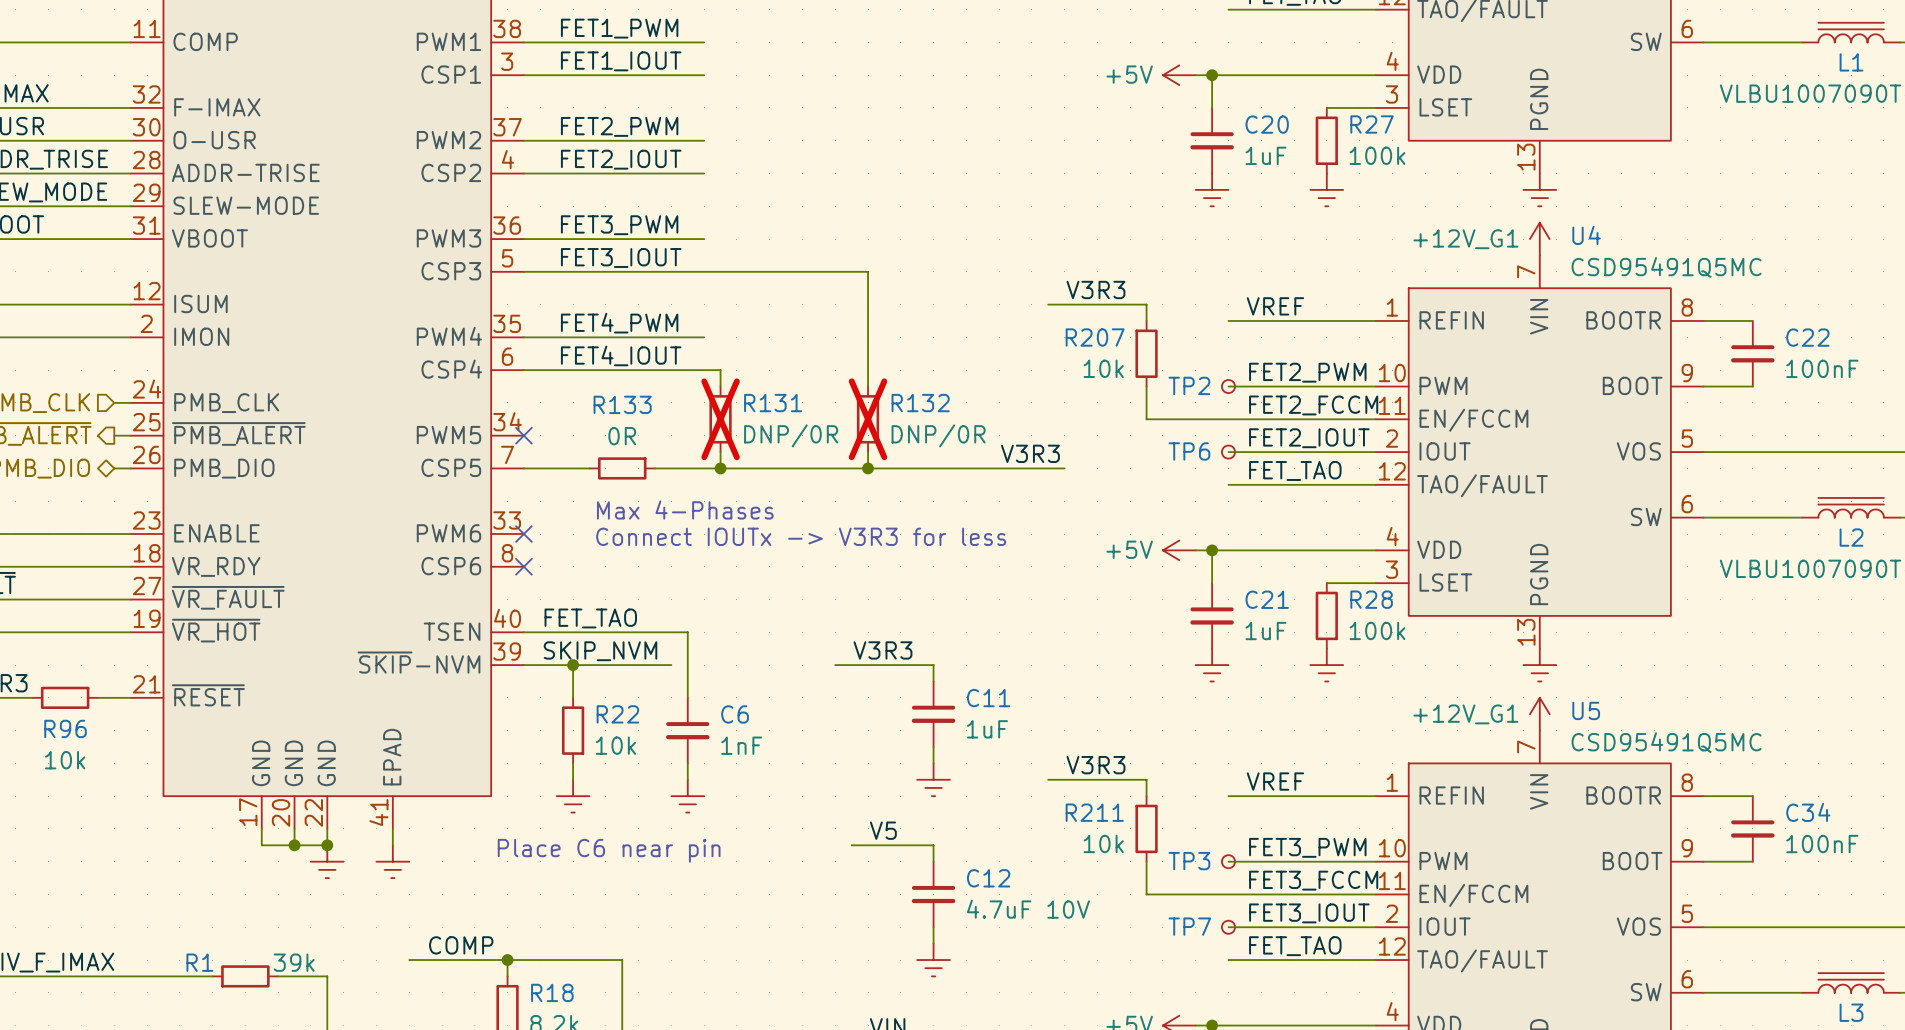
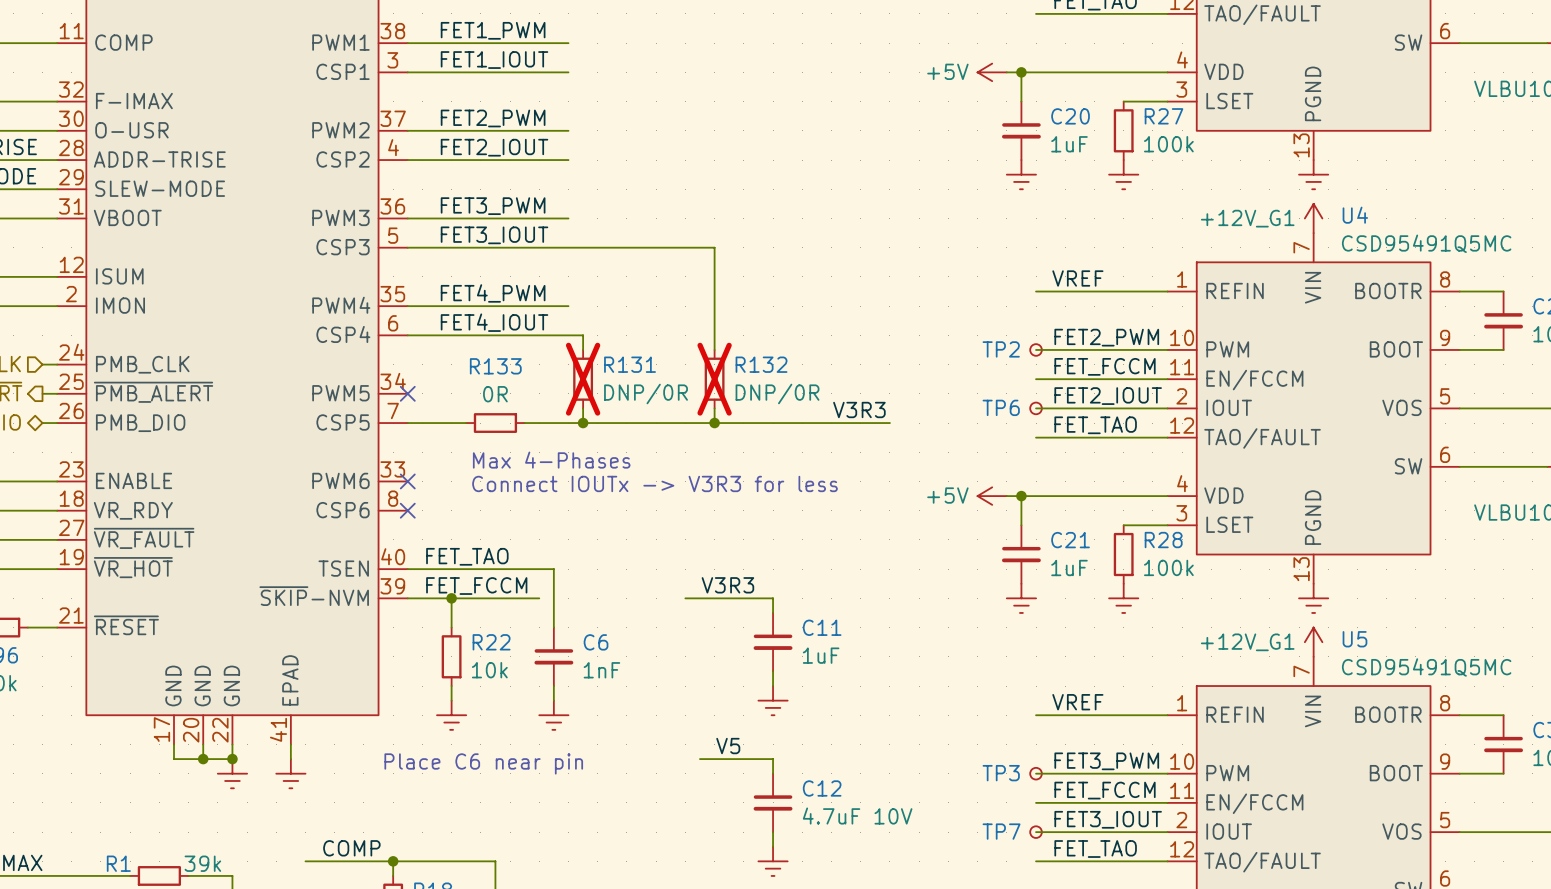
label: V3R3 (1095, 289) -> none
wire: (1048, 304) (1146, 304) (1146, 320) -> none
R207: 10k (1146, 353) -> none
wire: (1146, 386) (1146, 419) (1228, 419) -> none
label: FET2_FCCM (1313, 405) -> FET_FCCM (1105, 366)
label: SKIP_NVM (600, 651) -> FET_FCCM (476, 586)
label: V3R3 (1095, 765) -> none
wire: (1048, 779) (1146, 779) (1146, 796) -> none
R211: 10k (1146, 828) -> none
wire: (1146, 861) (1146, 894) (1228, 894) -> none
label: FET3_FCCM (1313, 880) -> FET_FCCM (1105, 790)

